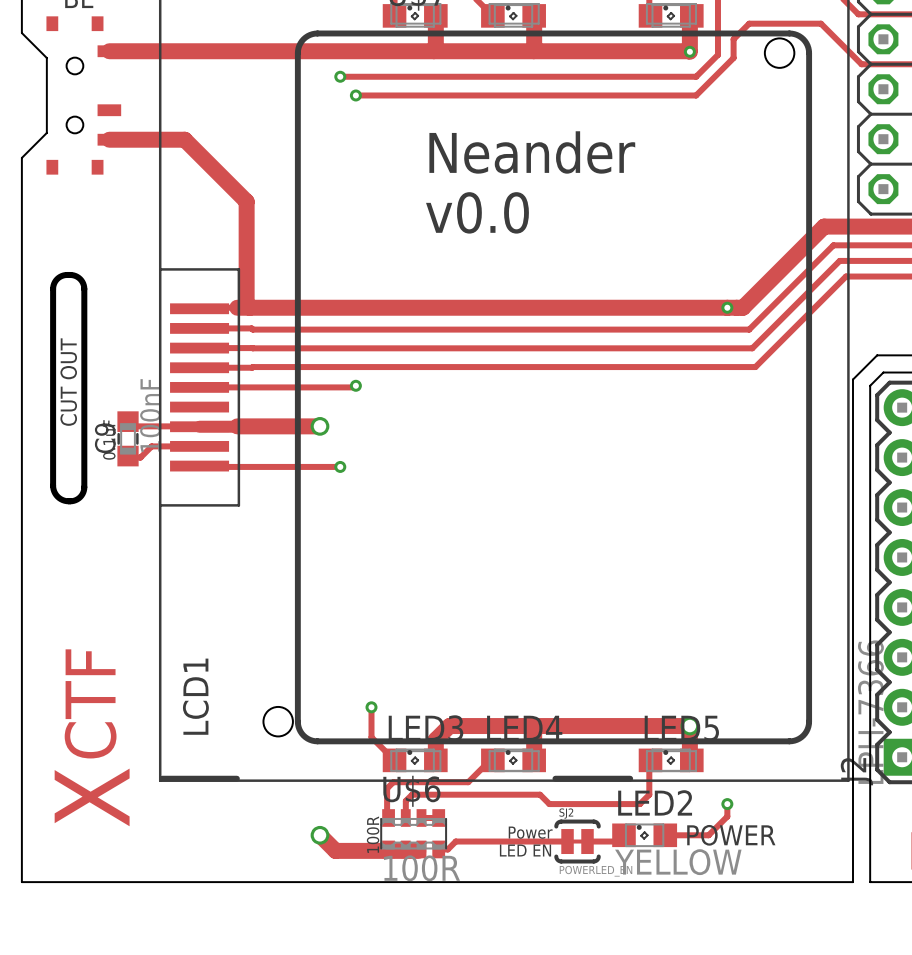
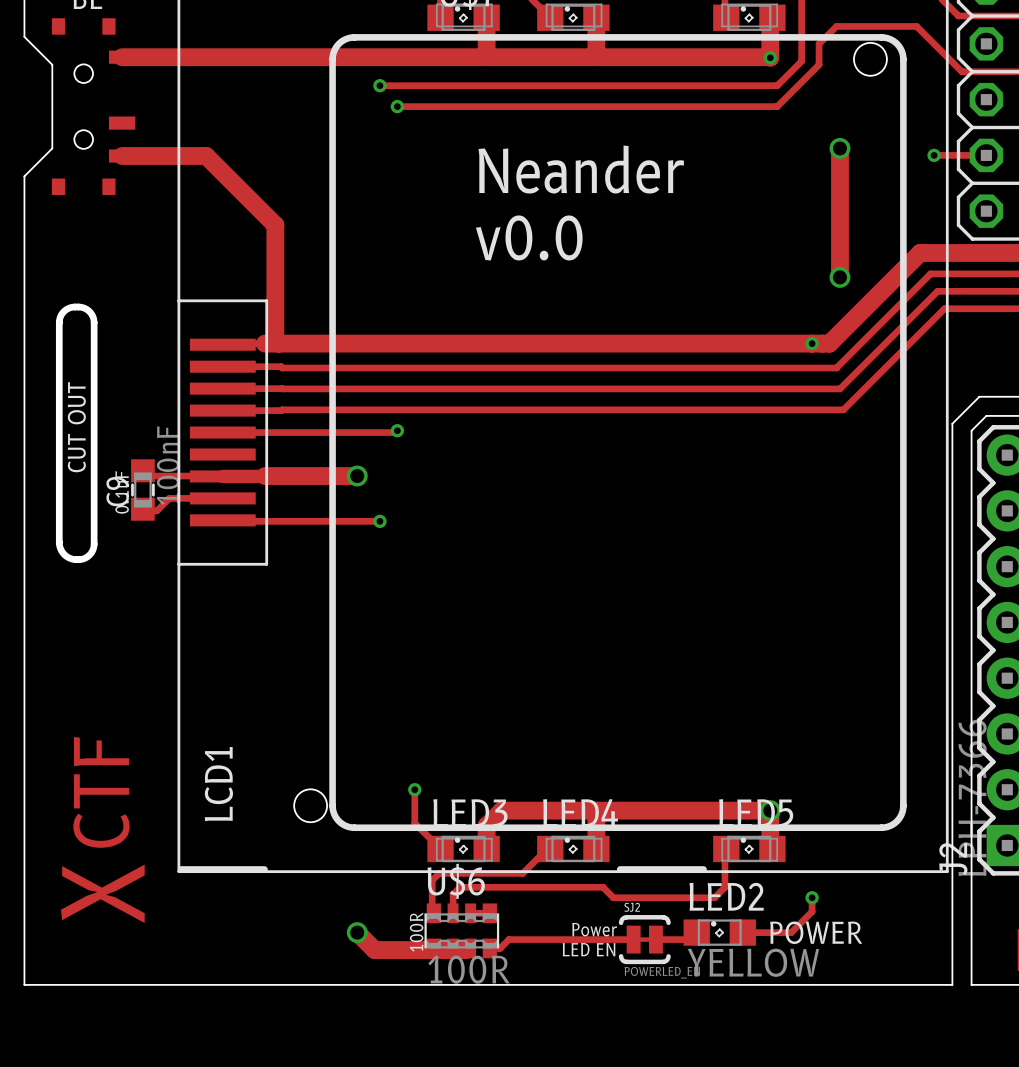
track: none -> (839, 148) (839, 277)
via: none -> (839, 148)
track: none -> (934, 155) (986, 155)
via: none -> (934, 155)
via: none -> (839, 277)

